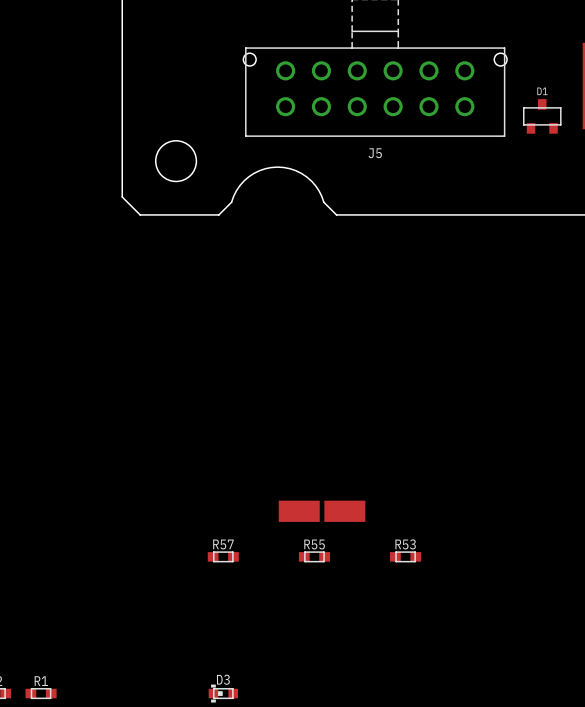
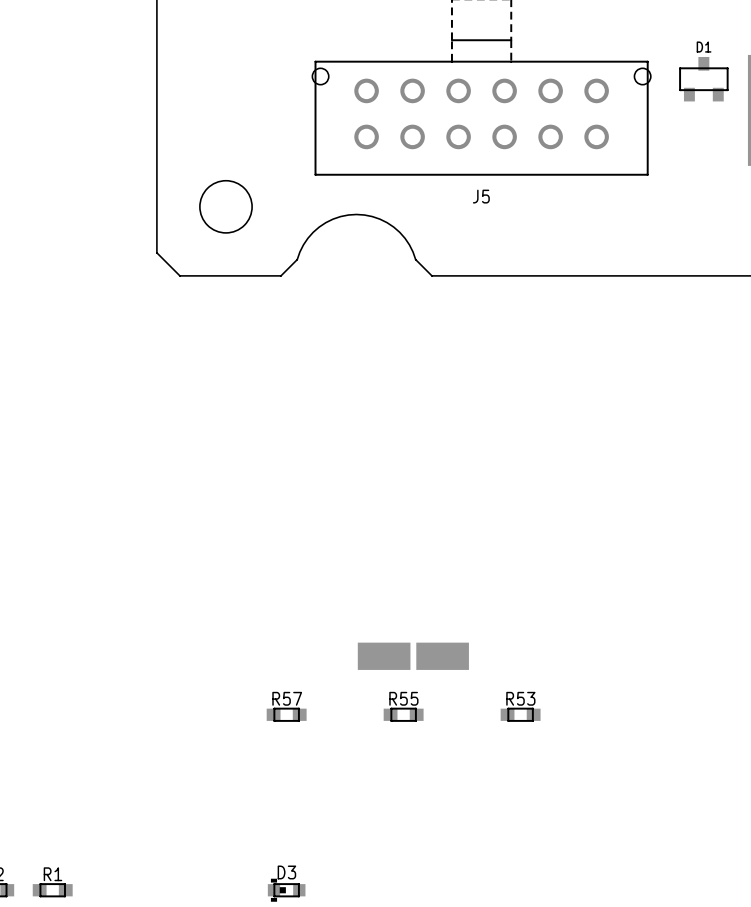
D1 position: (542, 116) -> (703, 79)

